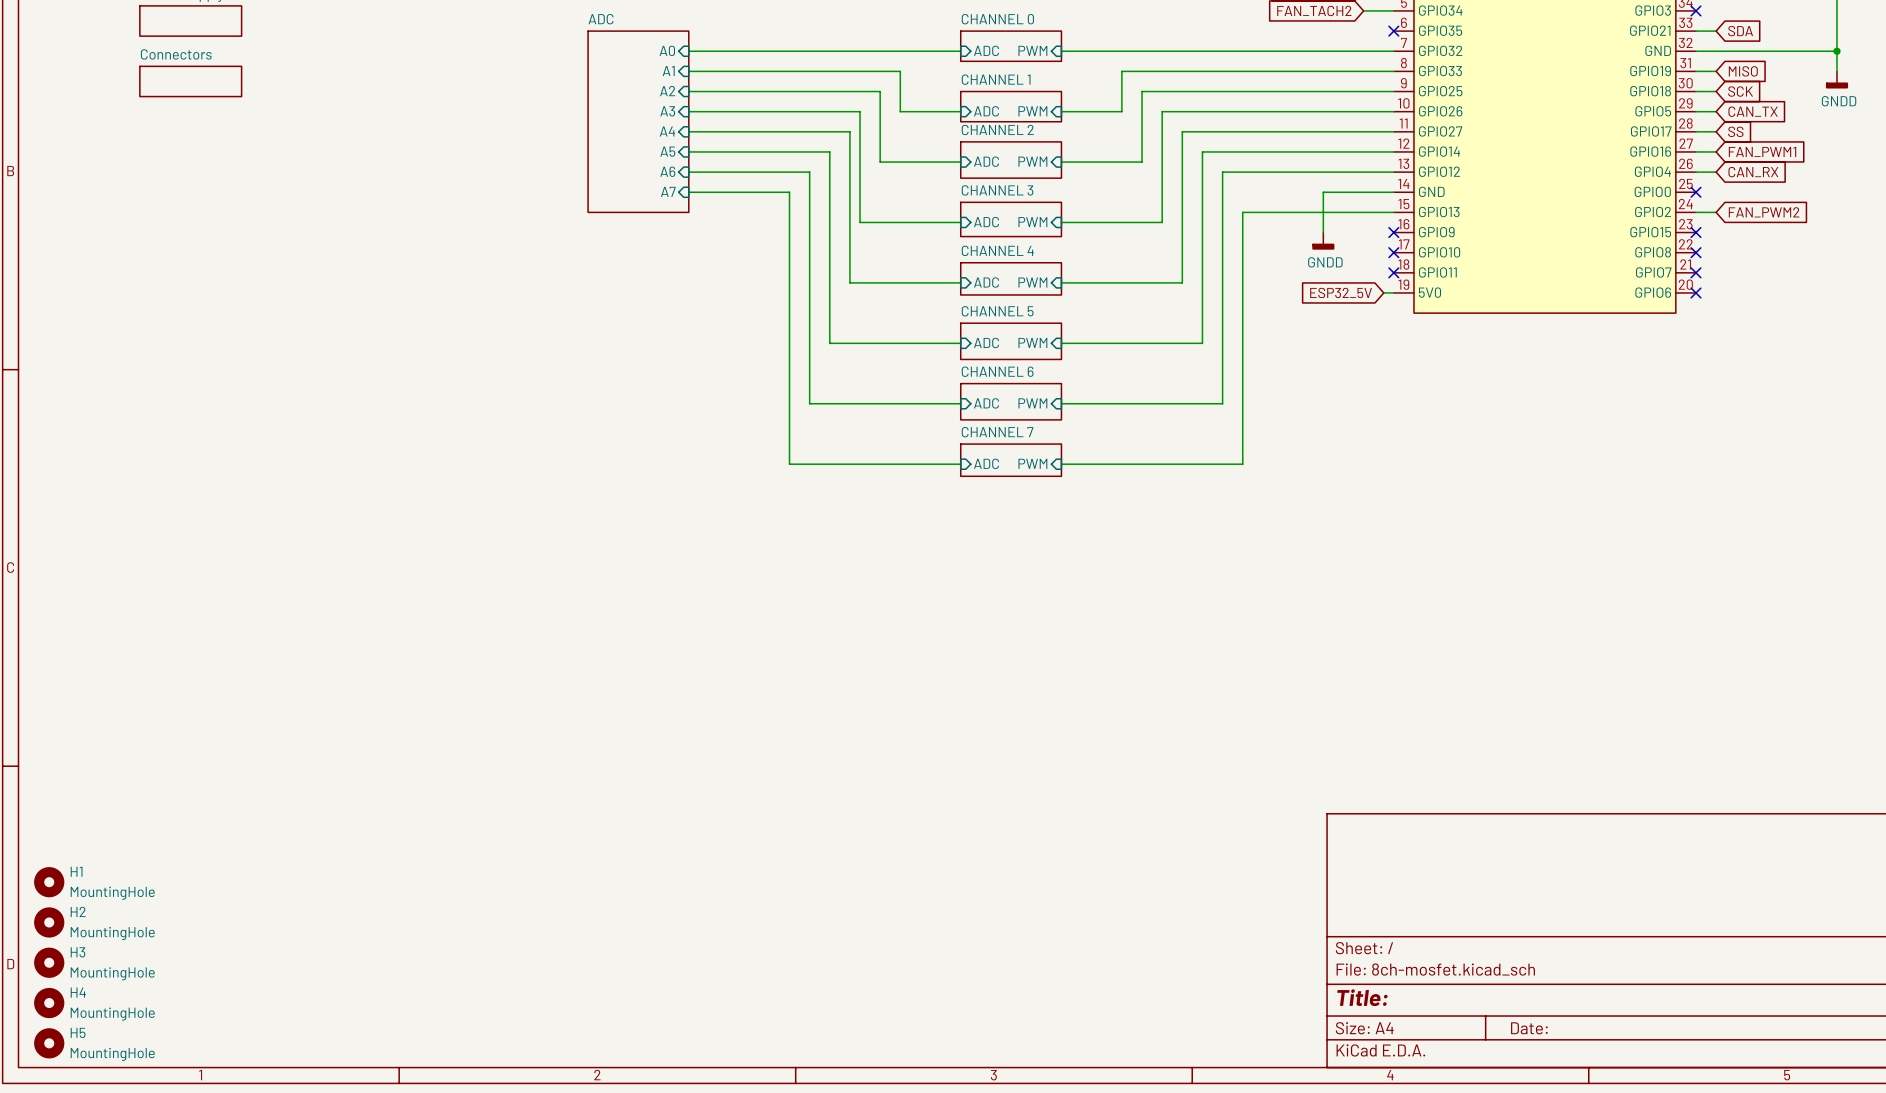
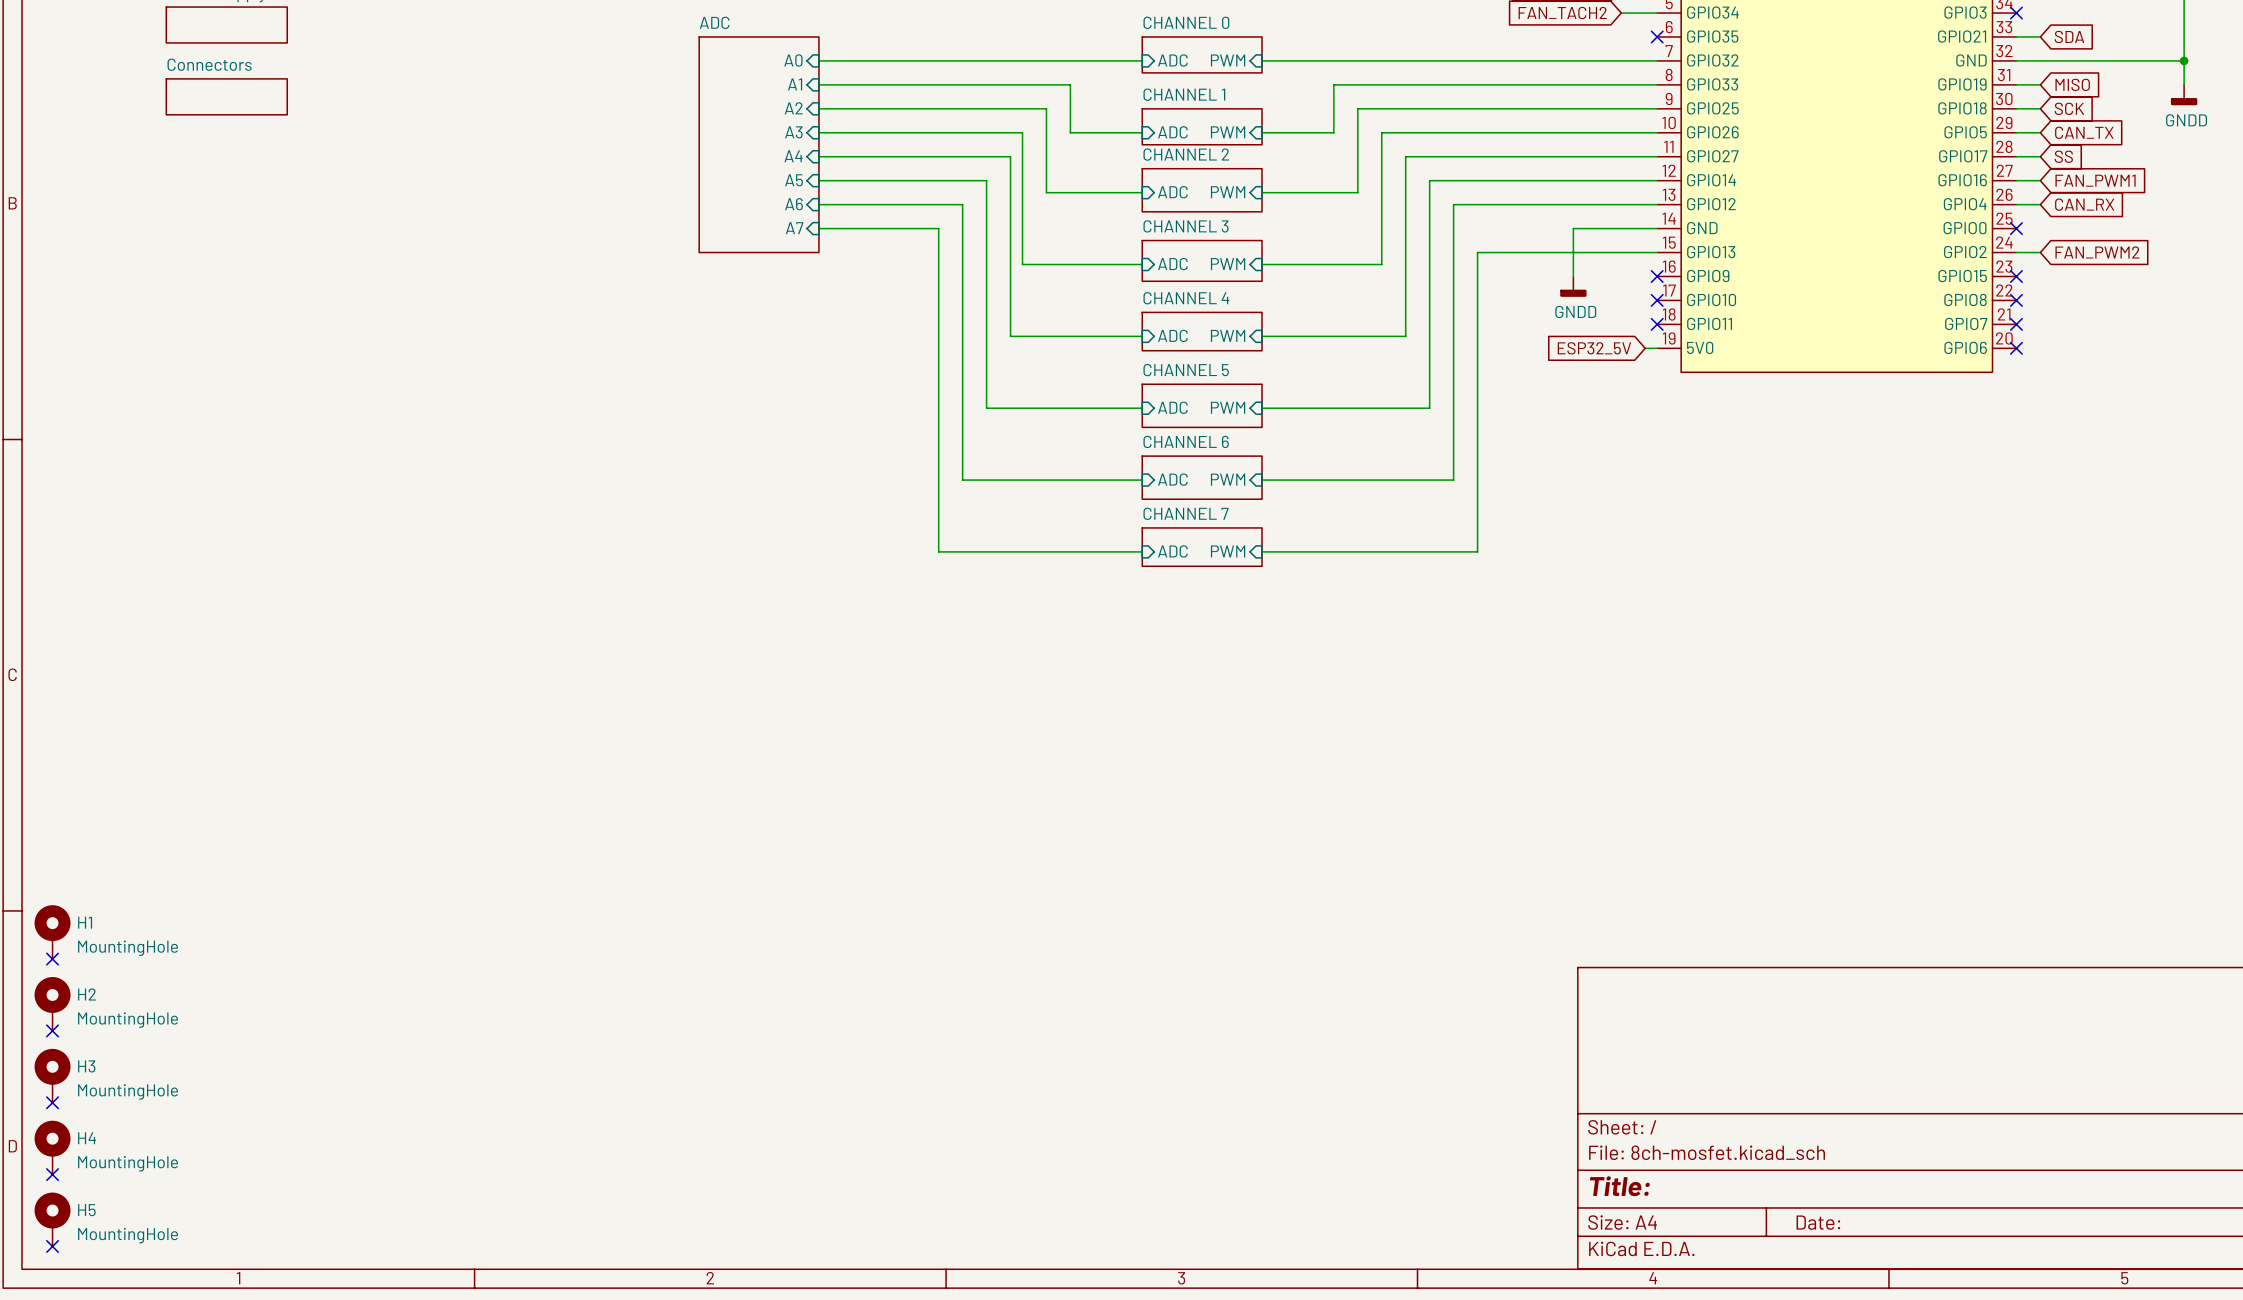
no-connect mark: none -> (52, 959)
H1 symbol: [34, 867, 65, 898] -> [34, 905, 71, 960]
no-connect mark: none -> (52, 1030)
H2 symbol: [34, 907, 65, 938] -> [34, 977, 71, 1031]
no-connect mark: none -> (52, 1102)
H3 symbol: [34, 947, 65, 978] -> [34, 1048, 71, 1103]
H4 symbol: [34, 987, 65, 1019] -> [34, 1120, 71, 1175]
no-connect mark: none -> (52, 1174)
H5 symbol: [34, 1028, 65, 1059] -> [34, 1192, 71, 1247]
no-connect mark: none -> (52, 1246)

